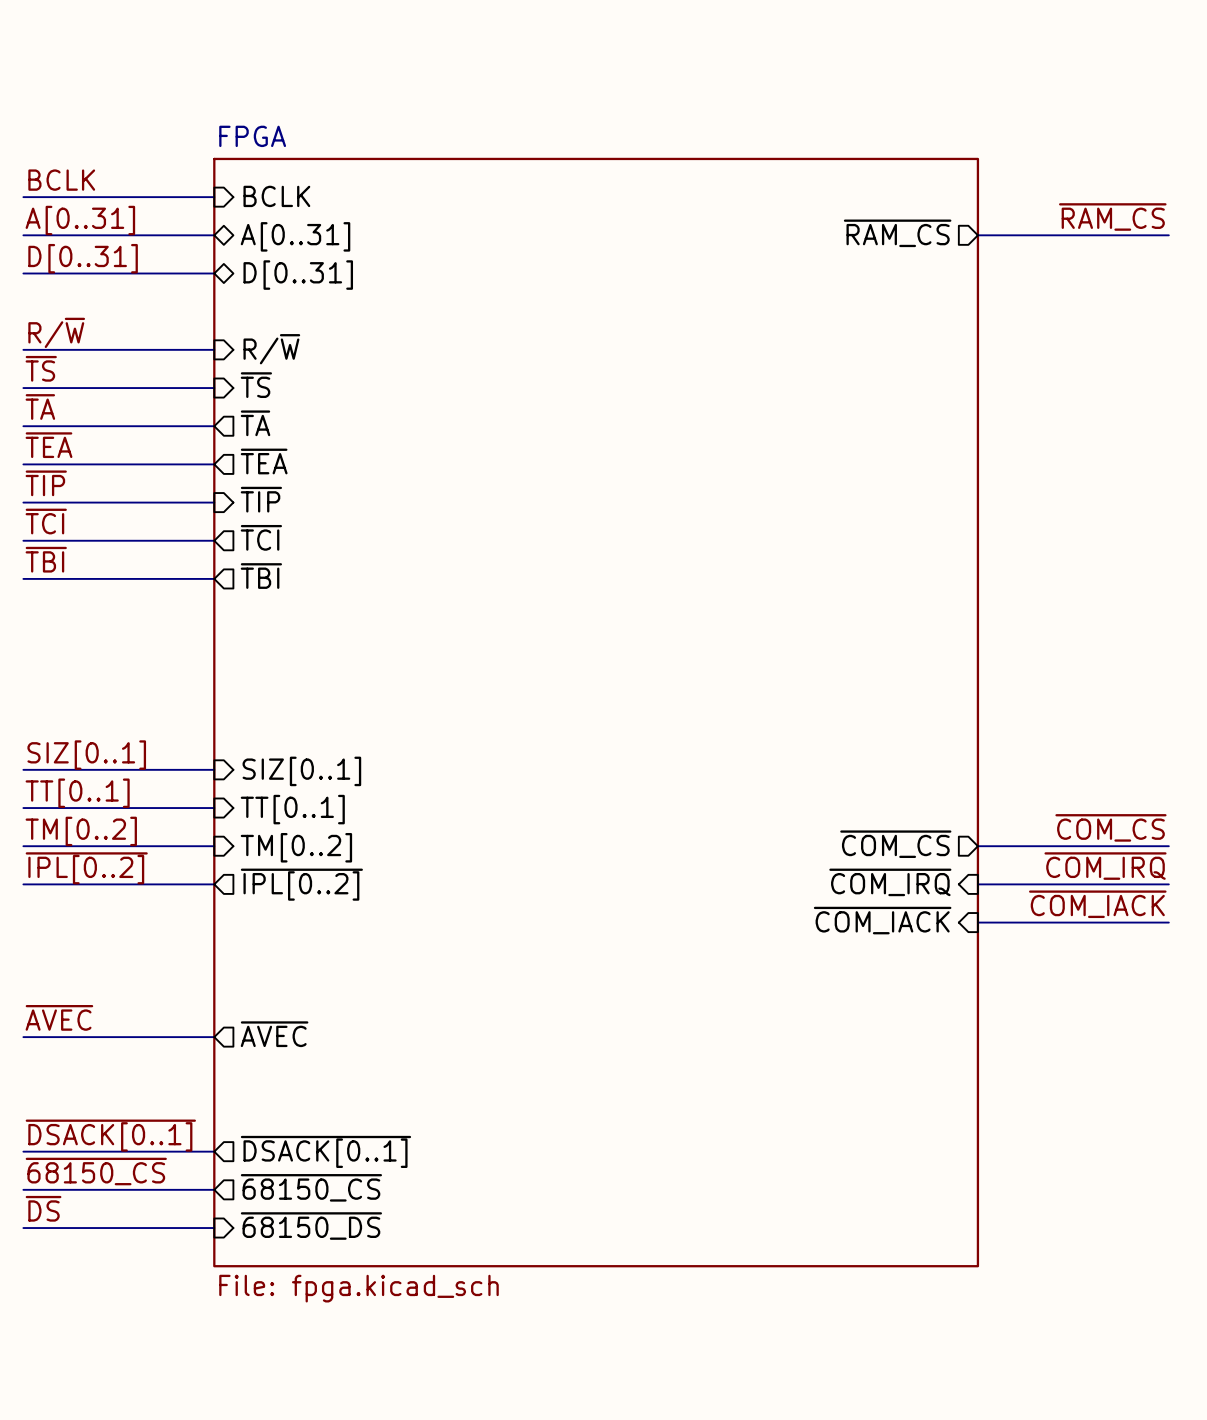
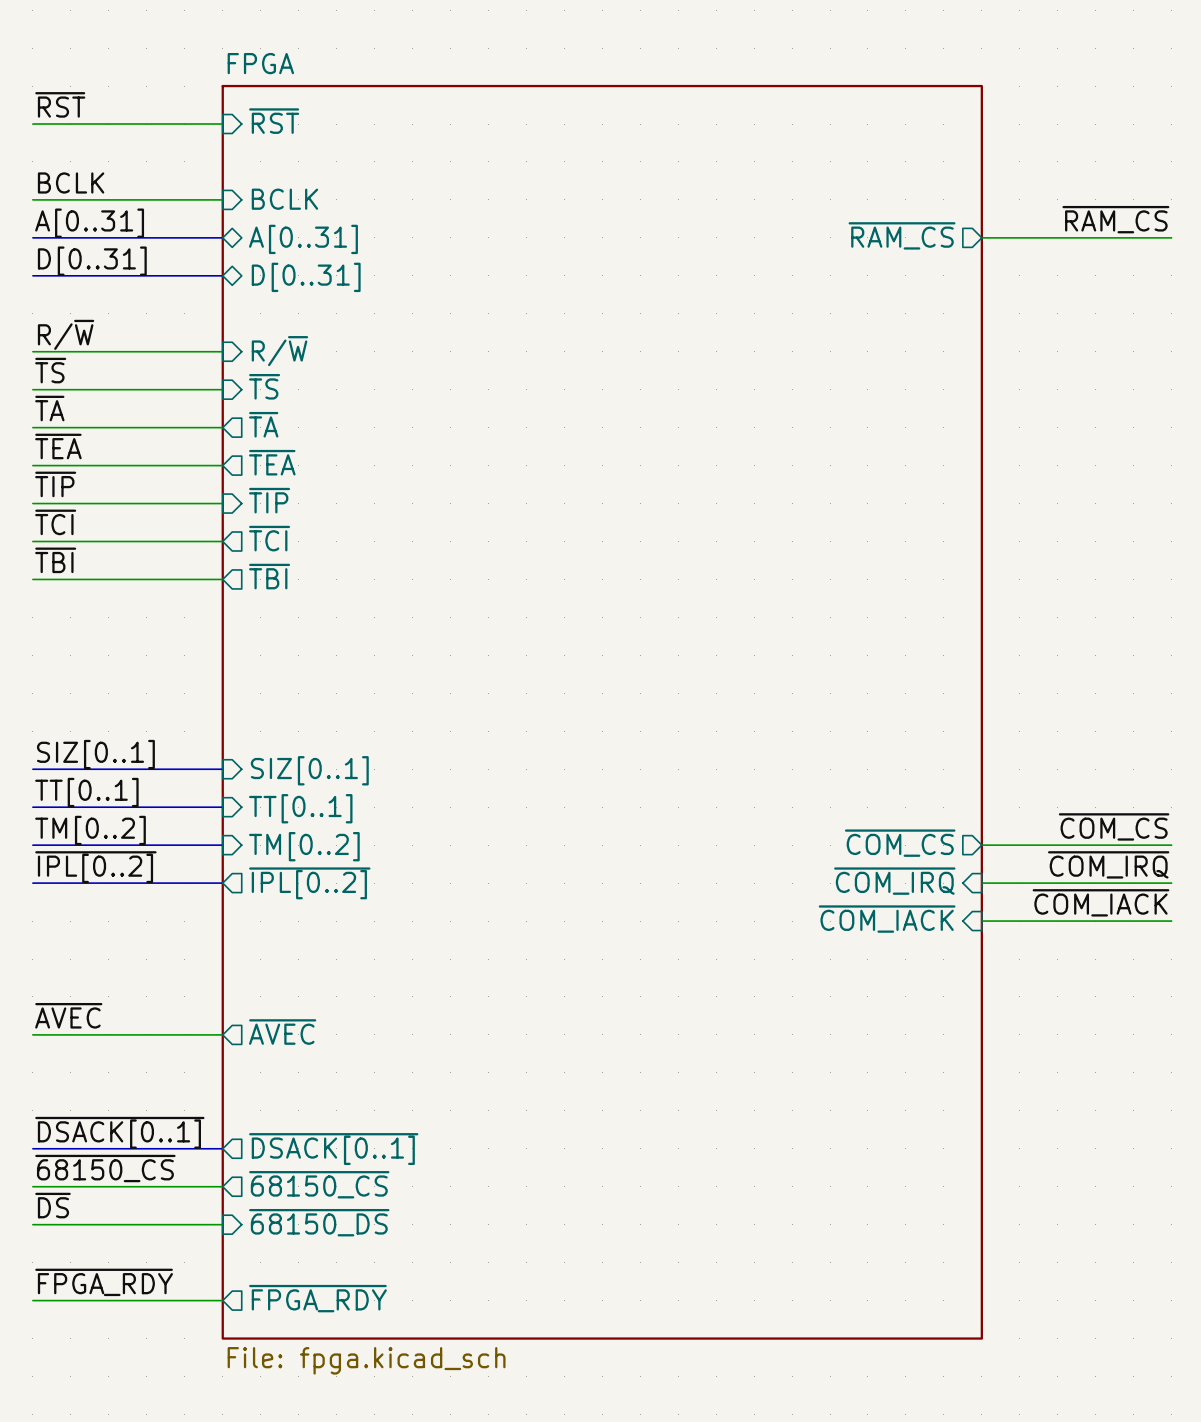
label: none -> ~{RST} (60, 104)
sheet pin: none -> ~{RST} (274, 121)
wire: none -> (32, 124) (222, 124)
sheet FPGA name position: FPGA (252, 136) -> FPGA (260, 63)
sheet FPGA shape: [213, 157, 980, 1268] -> [221, 84, 983, 1340]
label: none -> ~{FPGA_RDY} (104, 1282)
sheet FPGA value position: File: fpga.kicad_sch (358, 1288) -> File: fpga.kicad_sch (366, 1360)
sheet pin: none -> ~{FPGA_RDY} (317, 1298)
wire: none -> (32, 1300) (222, 1300)

